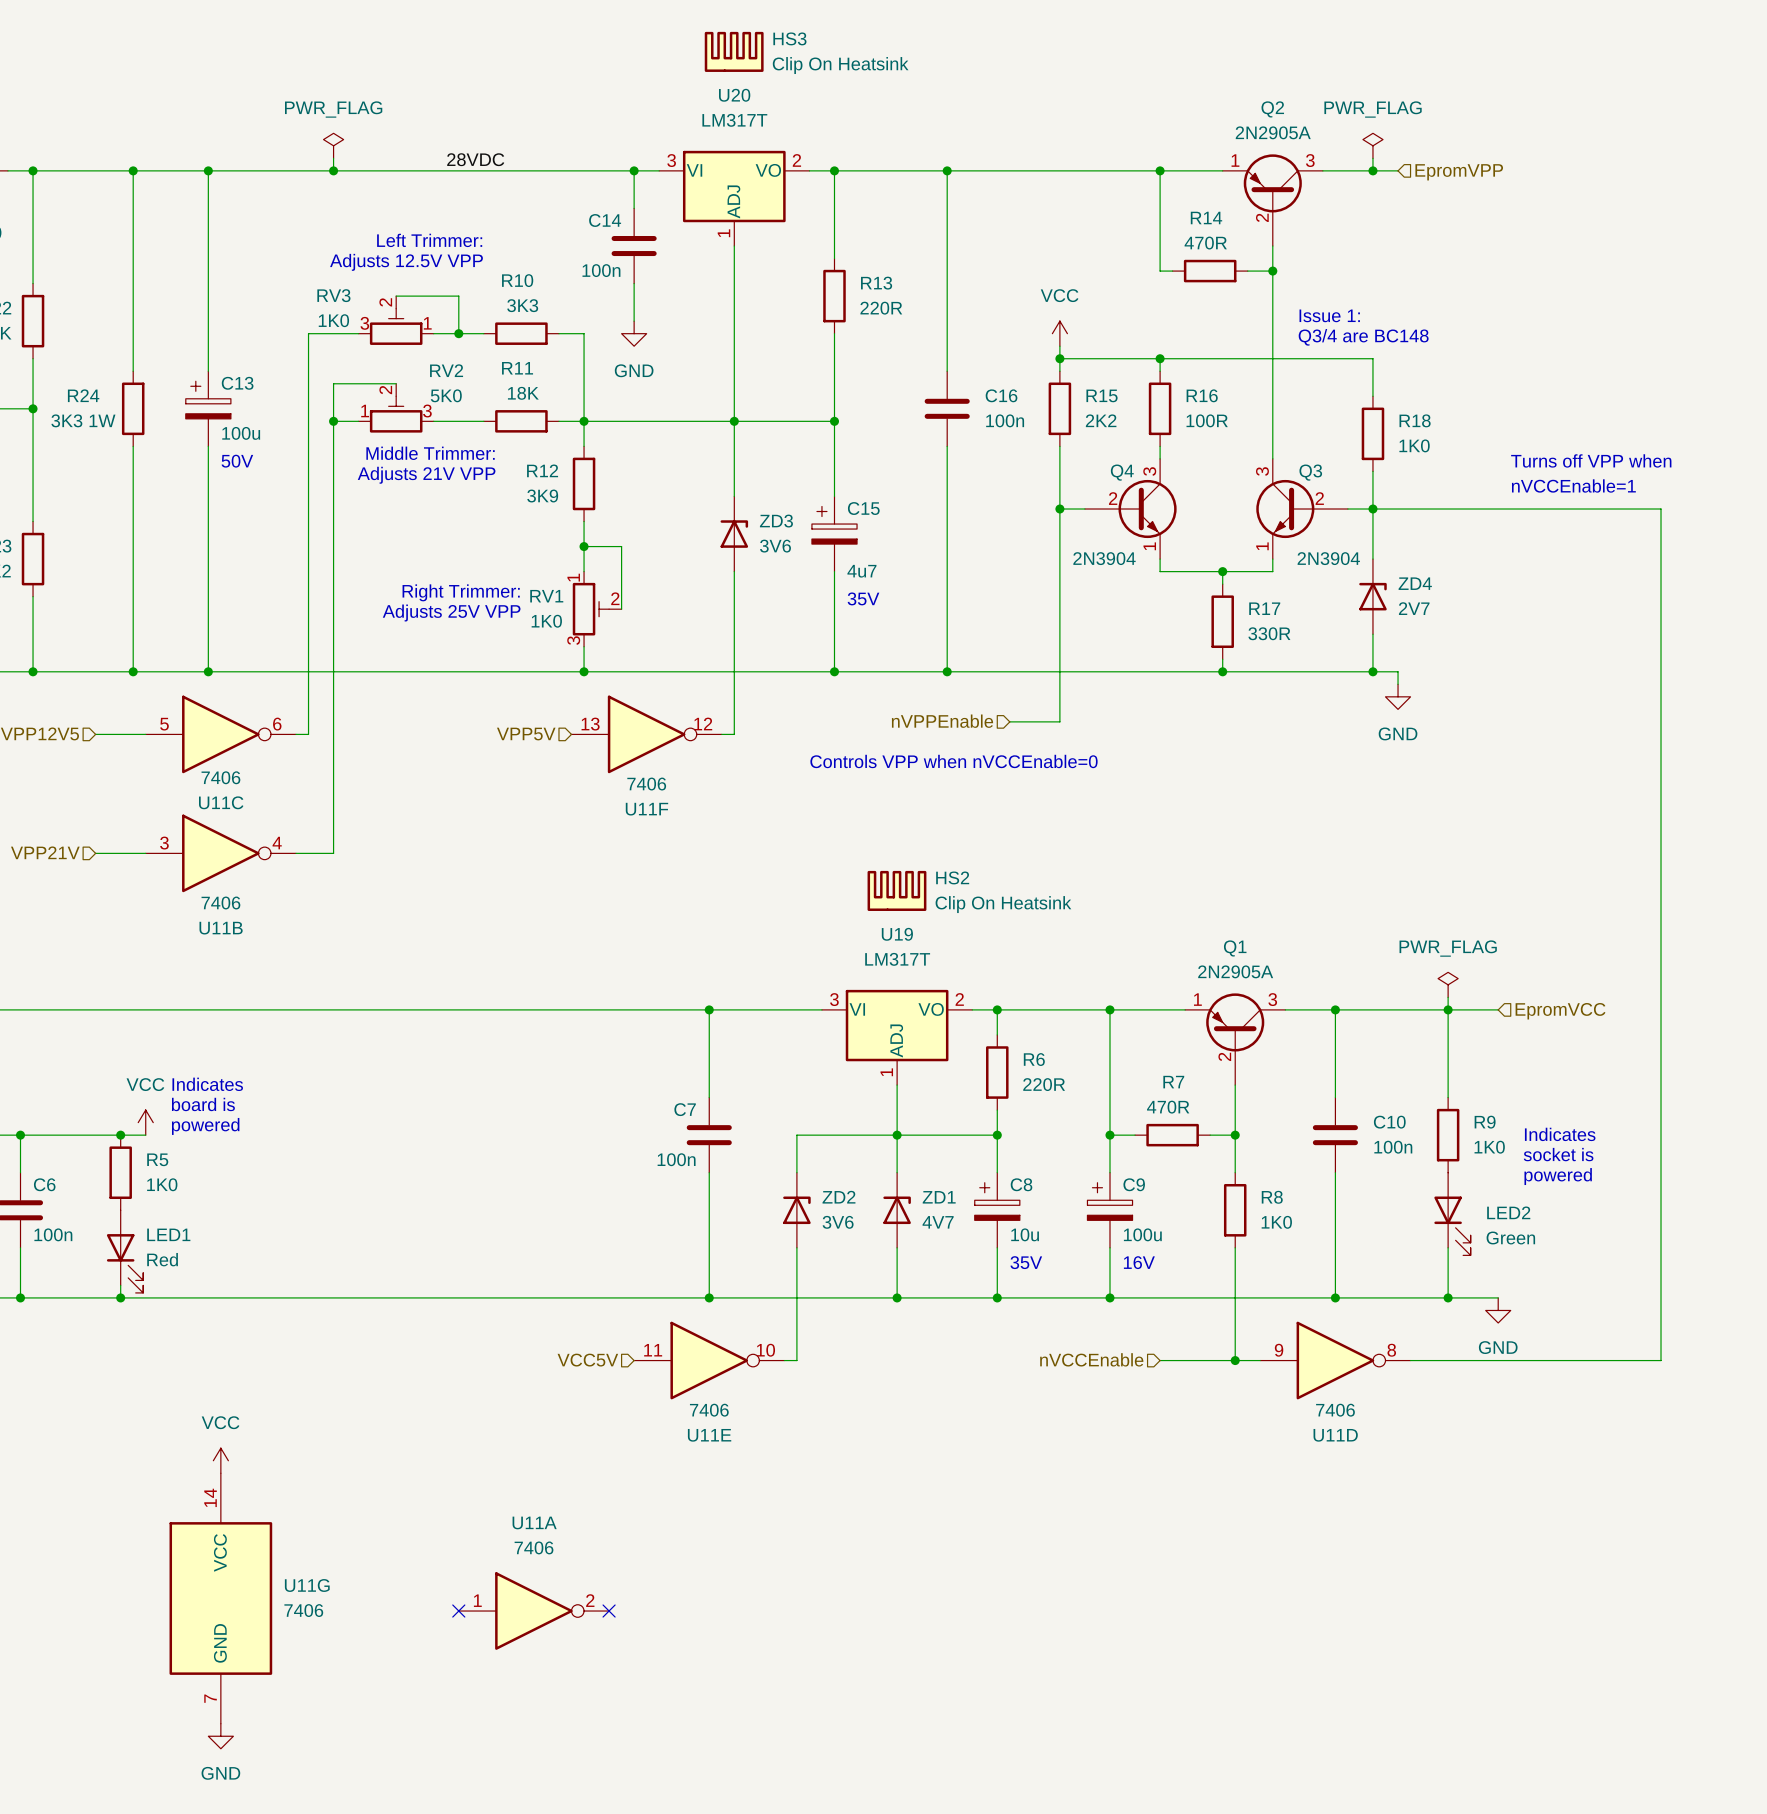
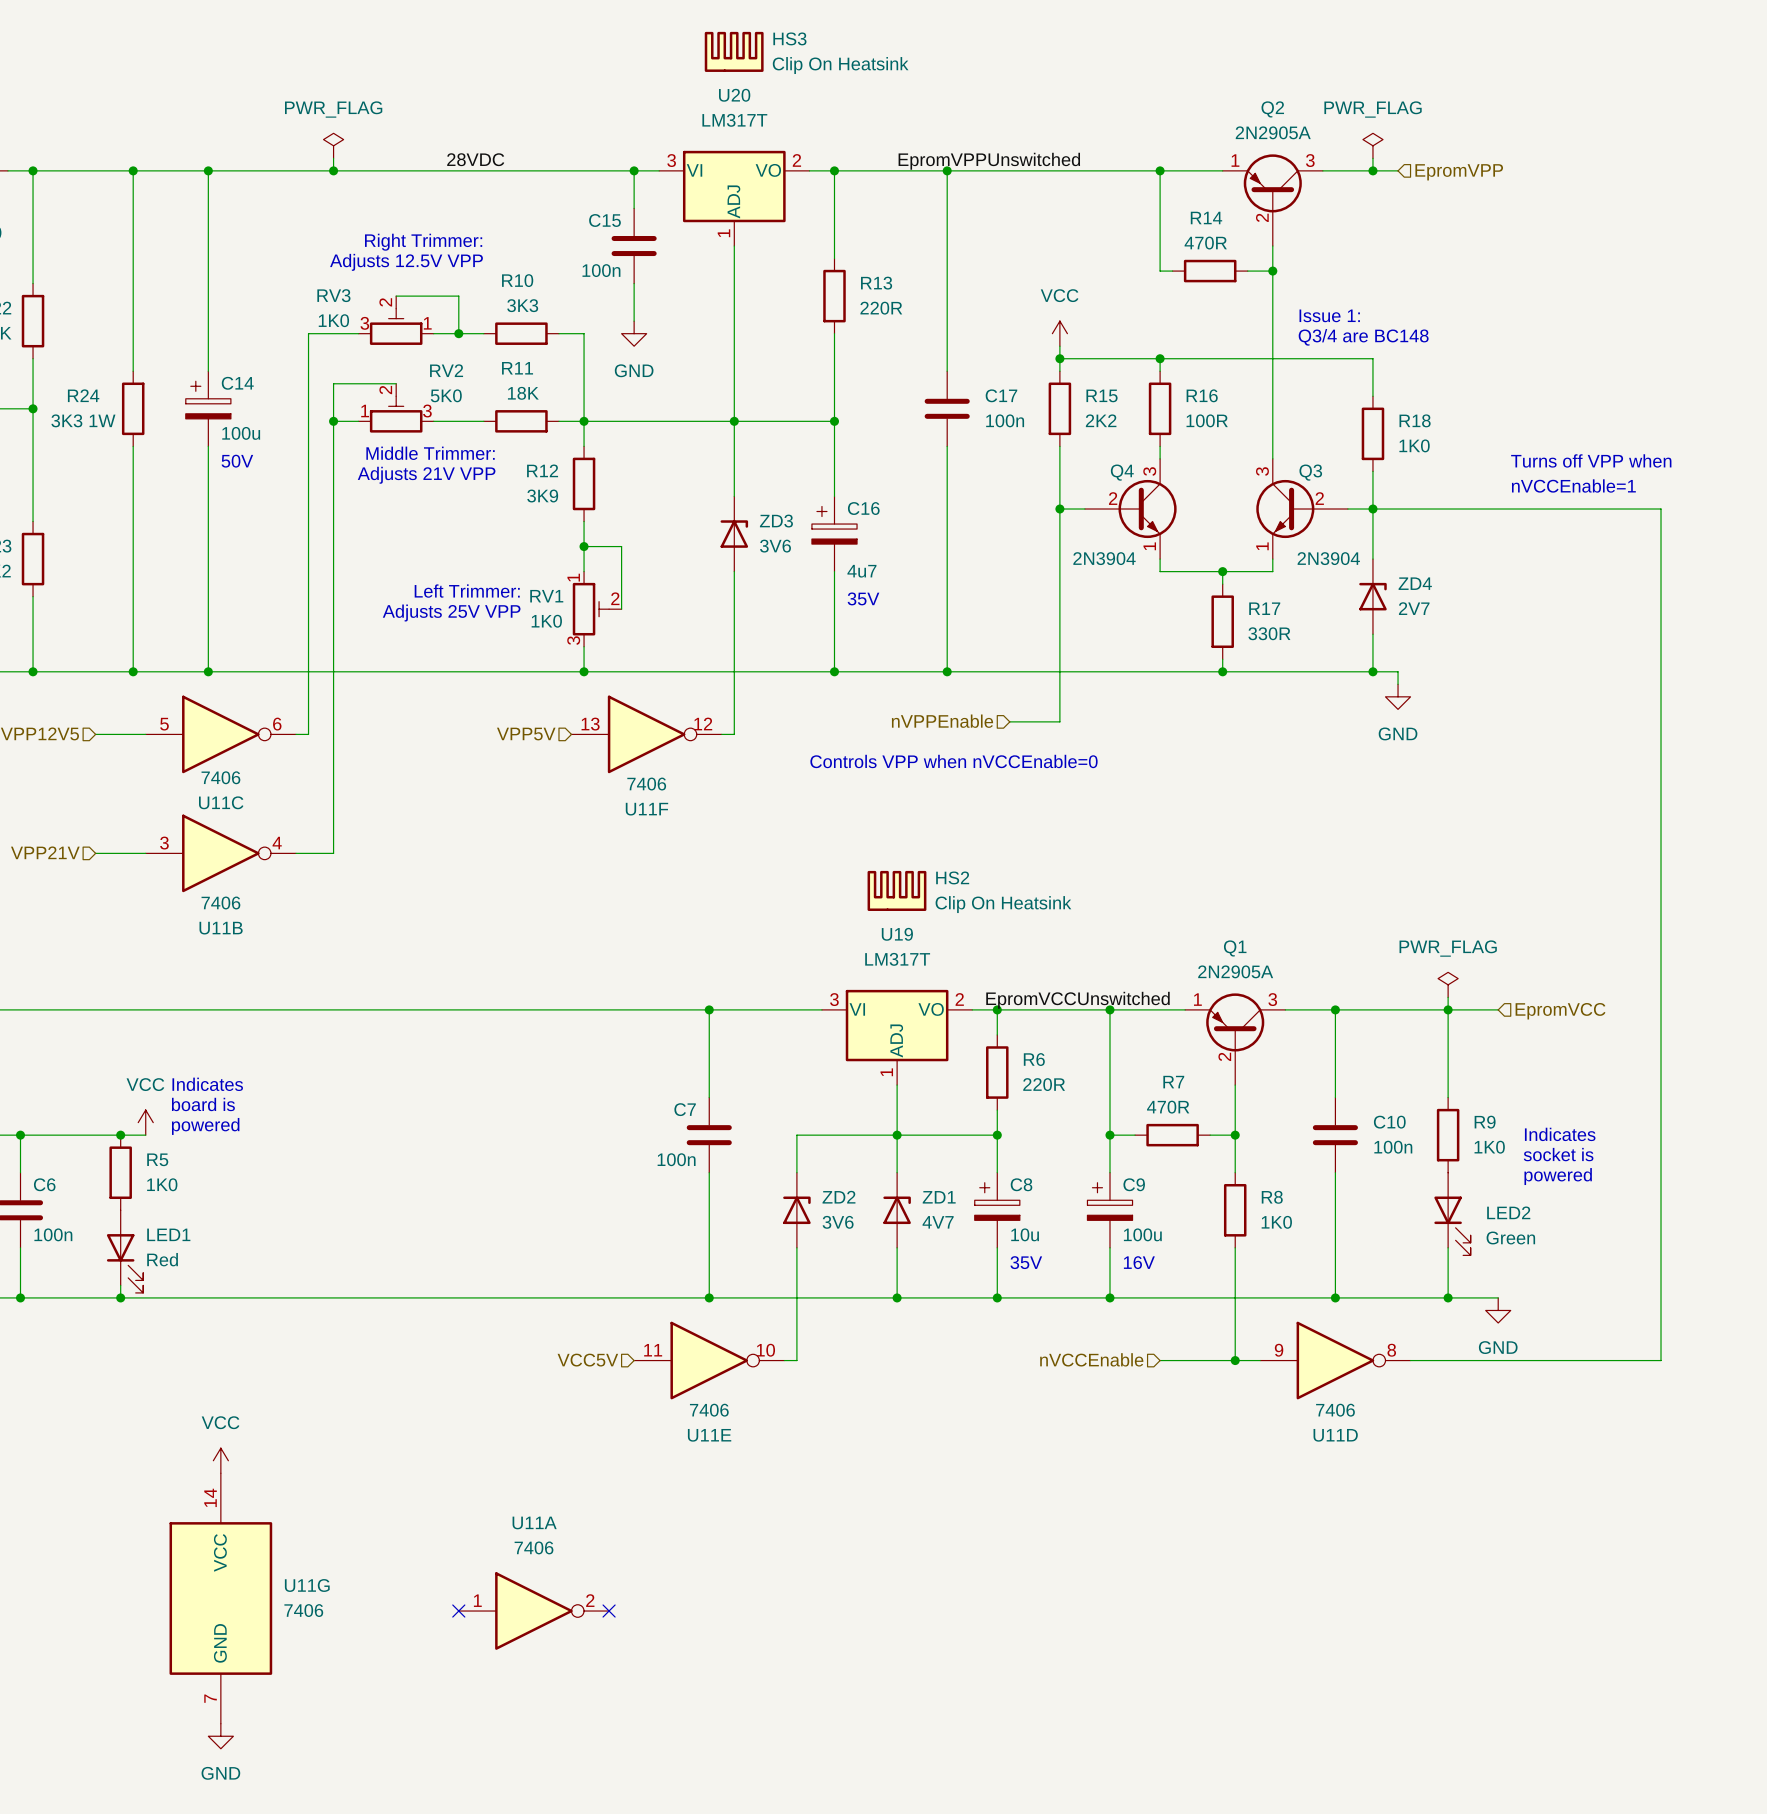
label: none -> EpromVPPUnswitched (989, 161)
C14 name: C14 (605, 220) -> C15 (604, 220)
text: Left Trimmer: (429, 240) -> Right Trimmer: (423, 242)
C13 name: C13 (237, 383) -> C14 (237, 383)
C16 name: C16 (1001, 395) -> C17 (1001, 395)
C15 name: C15 (863, 508) -> C16 (863, 508)
text: Right Trimmer: (461, 592) -> Left Trimmer: (467, 591)
label: none -> EpromVCCUnswitched (1077, 1000)

